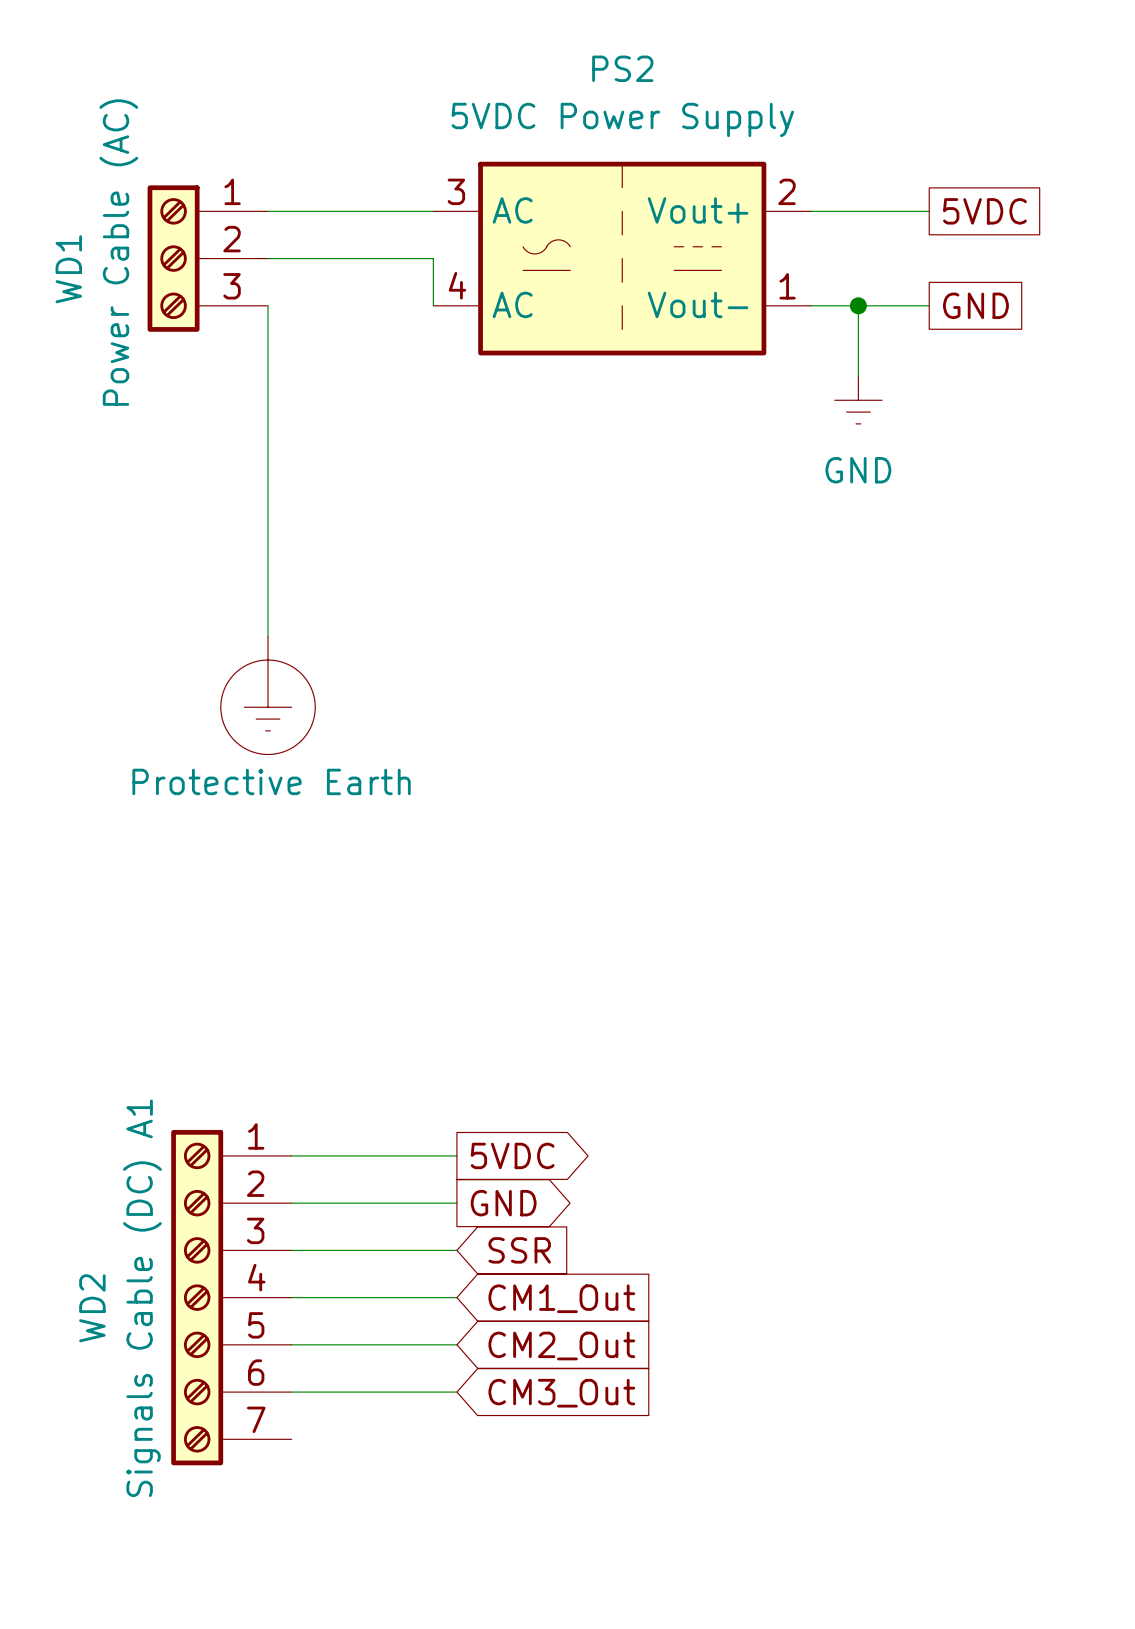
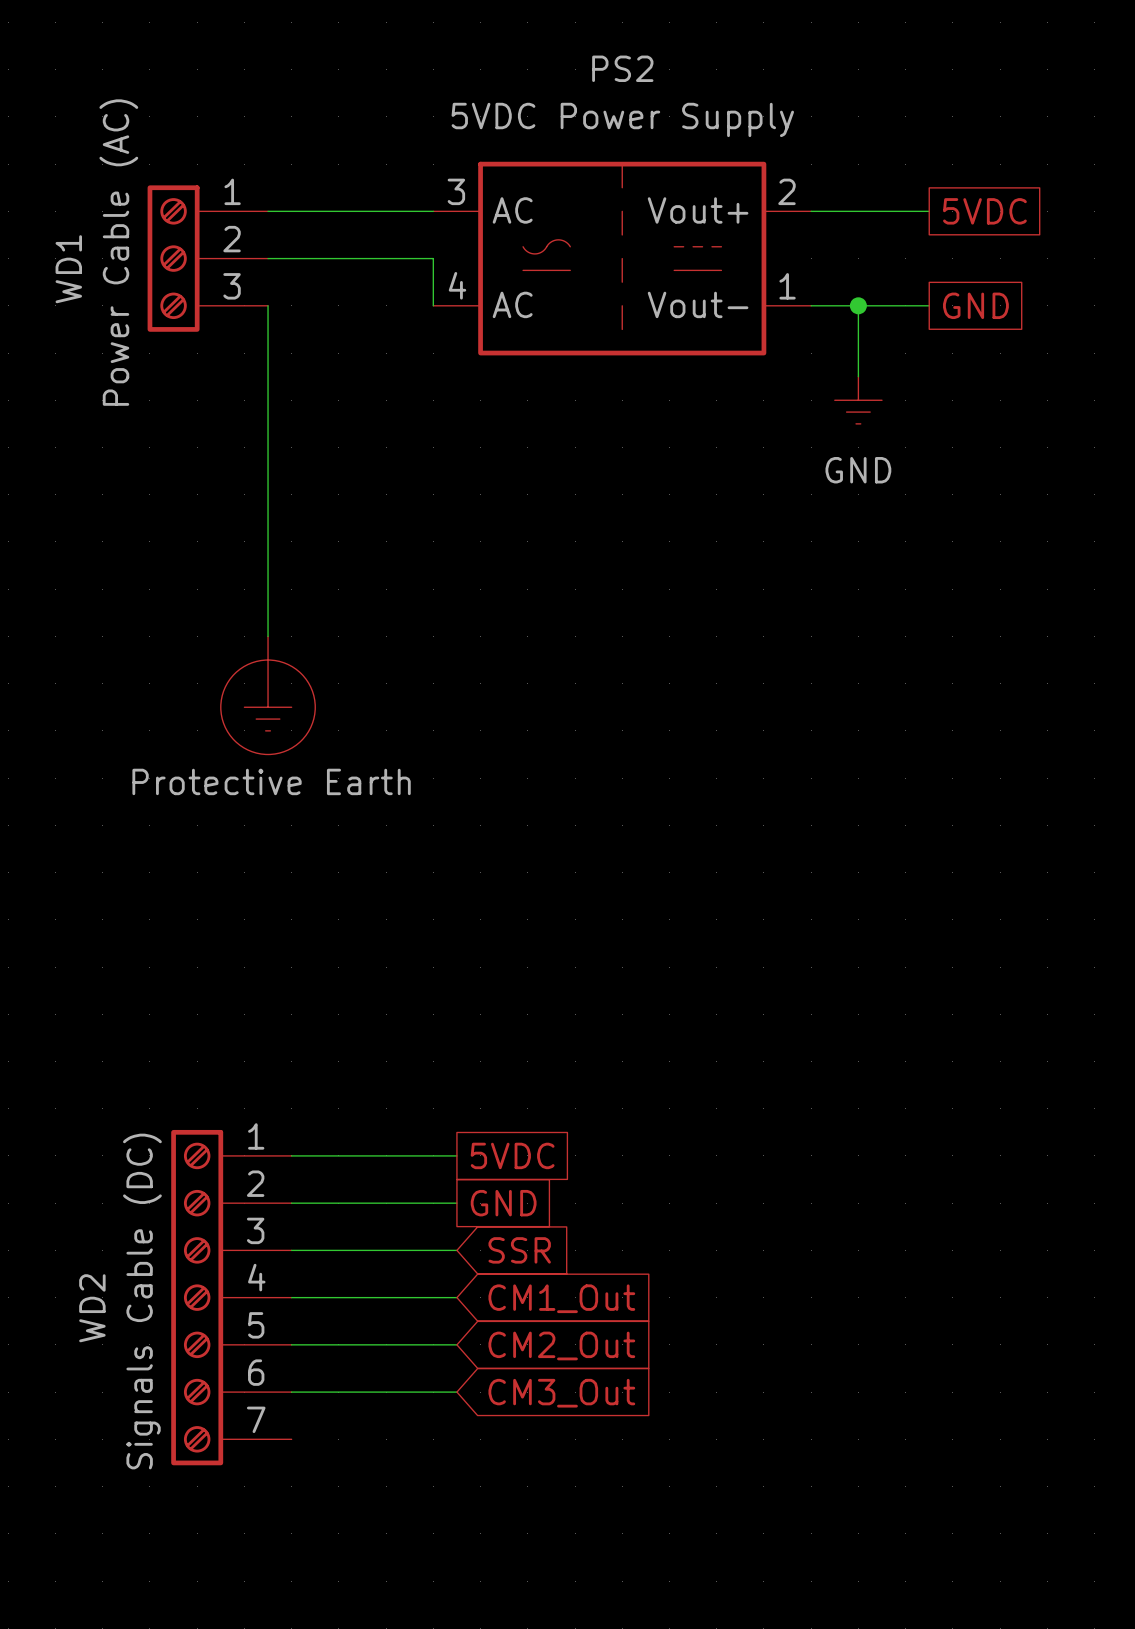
global label shape: output (512, 1155) -> passive (512, 1155)
global label shape: output (503, 1203) -> passive (503, 1203)
WD2 value: Signals Cable (DC) A1 (142, 1298) -> Signals Cable (DC) (142, 1301)

